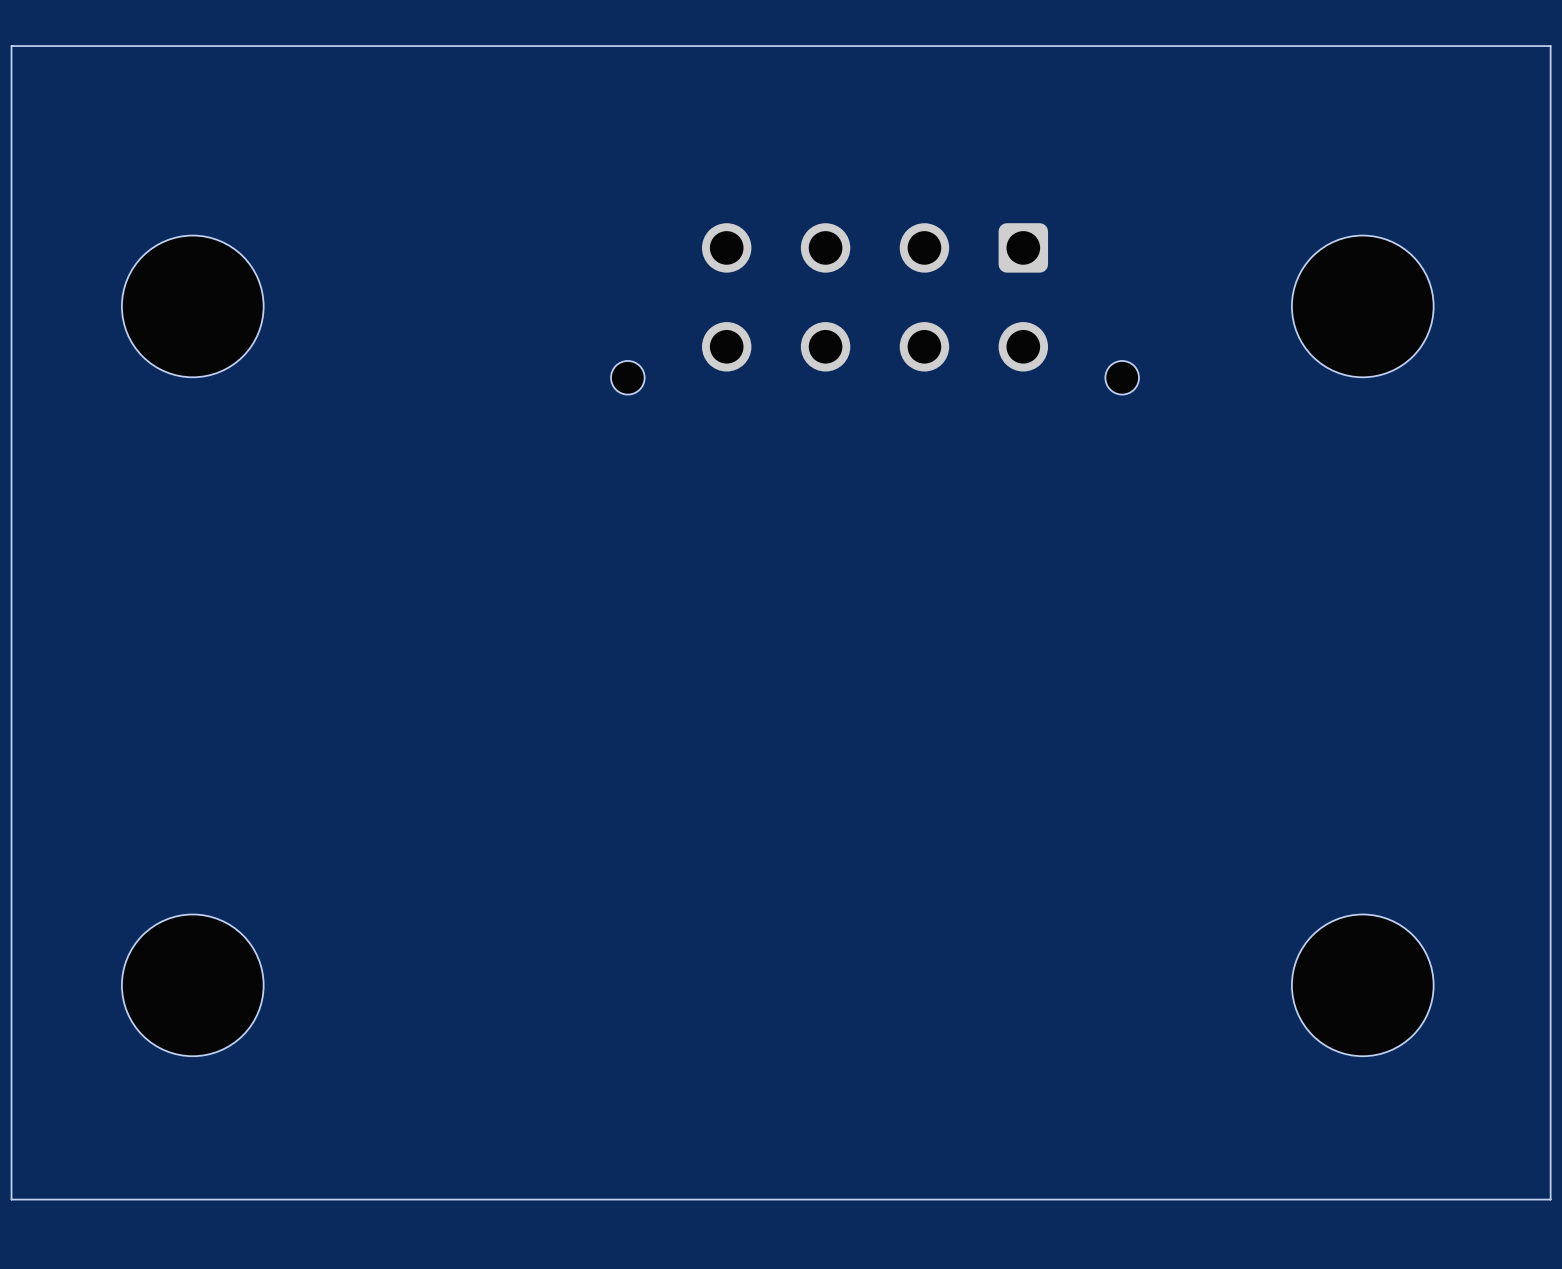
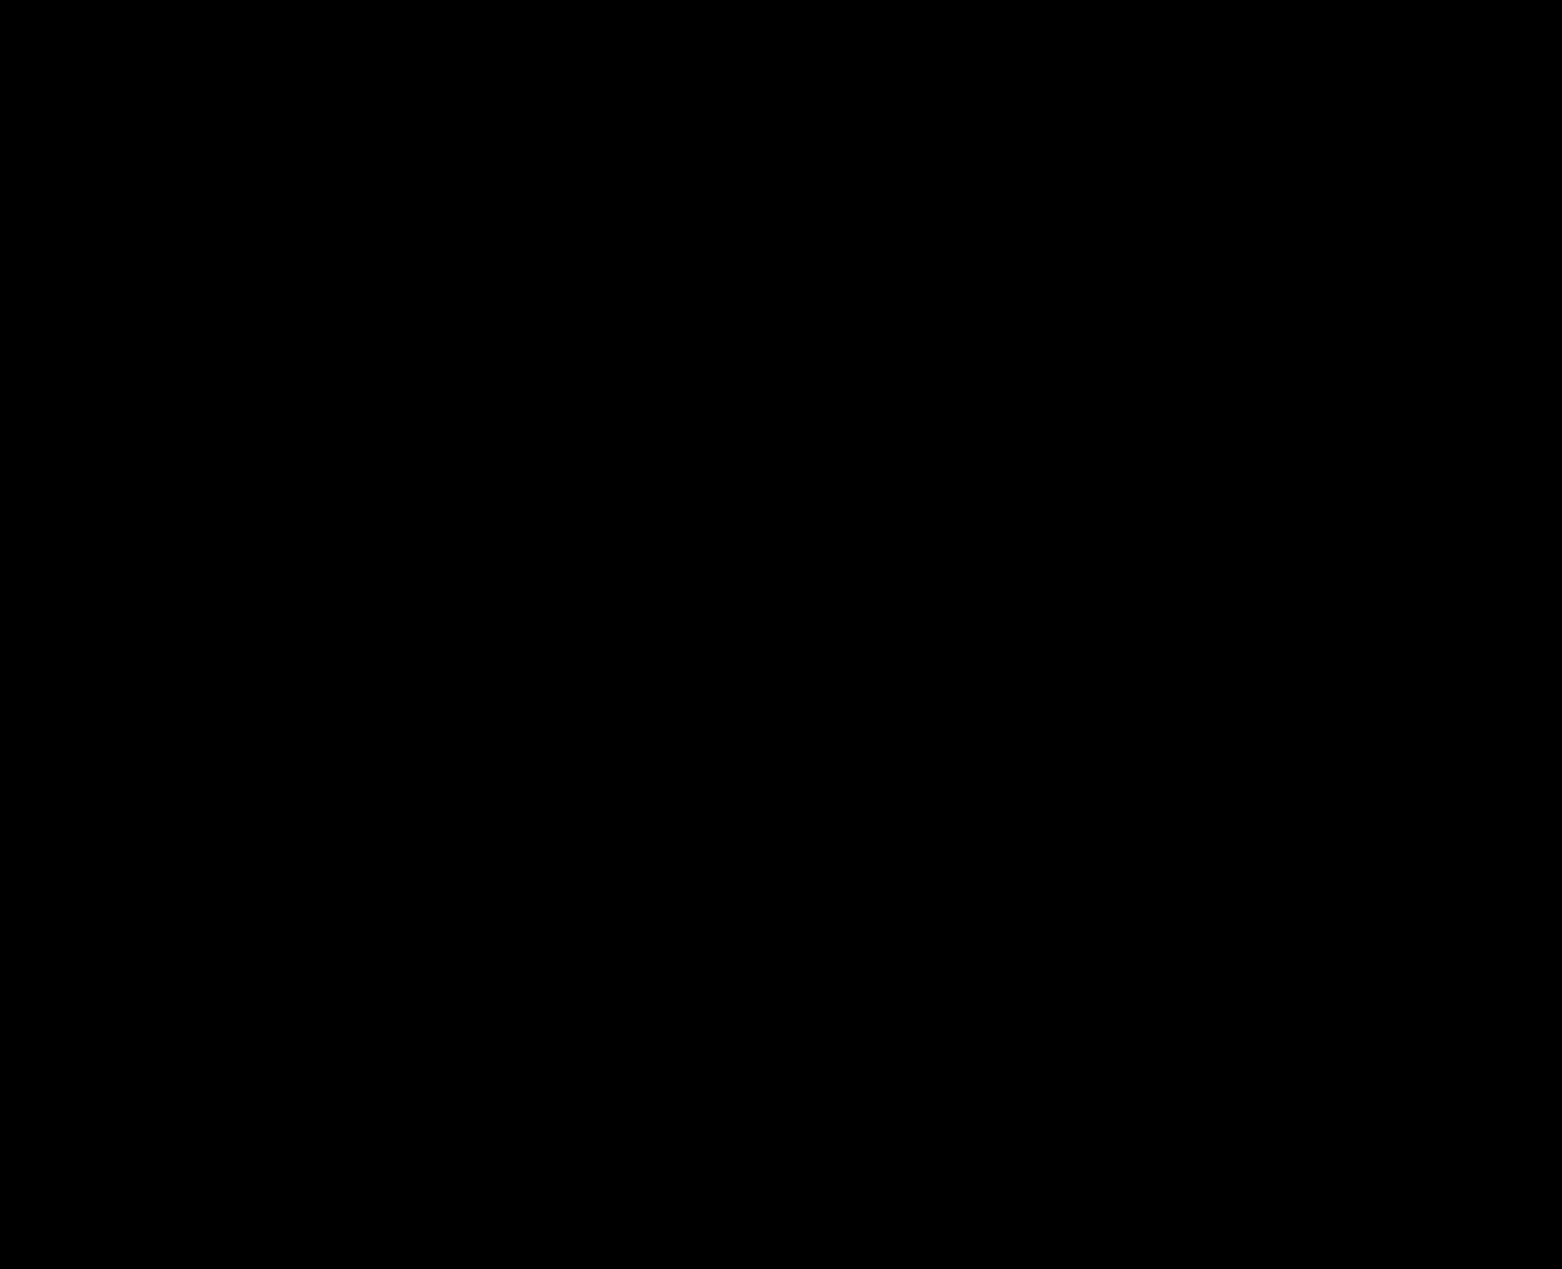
board edge: (1550, 46) (11, 46) (11, 1199) (1550, 1199) (1550, 46) -> none
part: (192, 306) -> none
part: (1362, 306) -> none
part: (875, 308) -> none
part: (192, 985) -> none
part: (1362, 985) -> none

